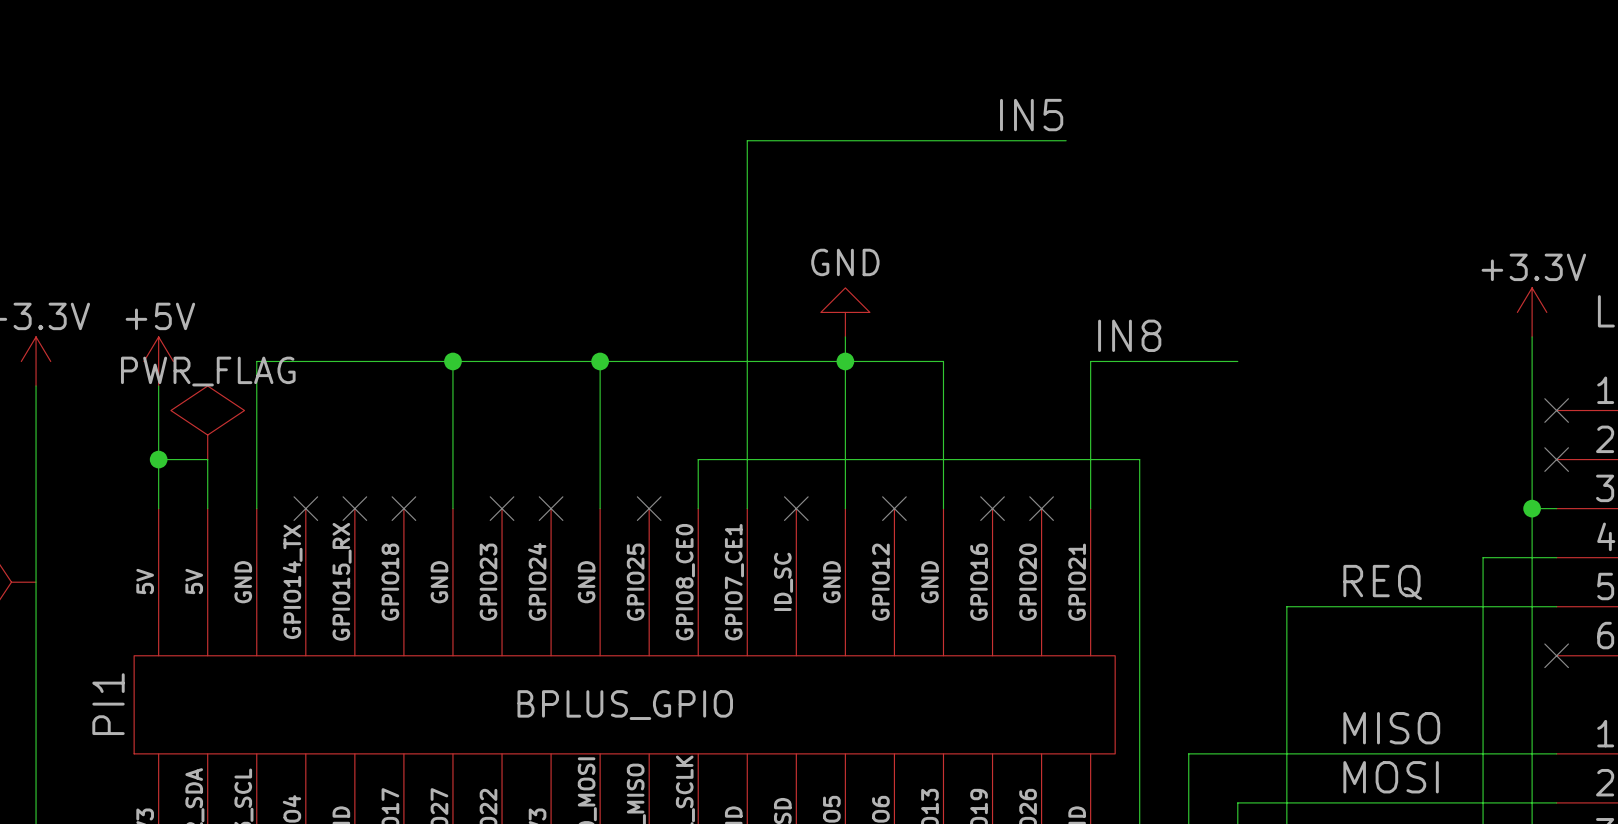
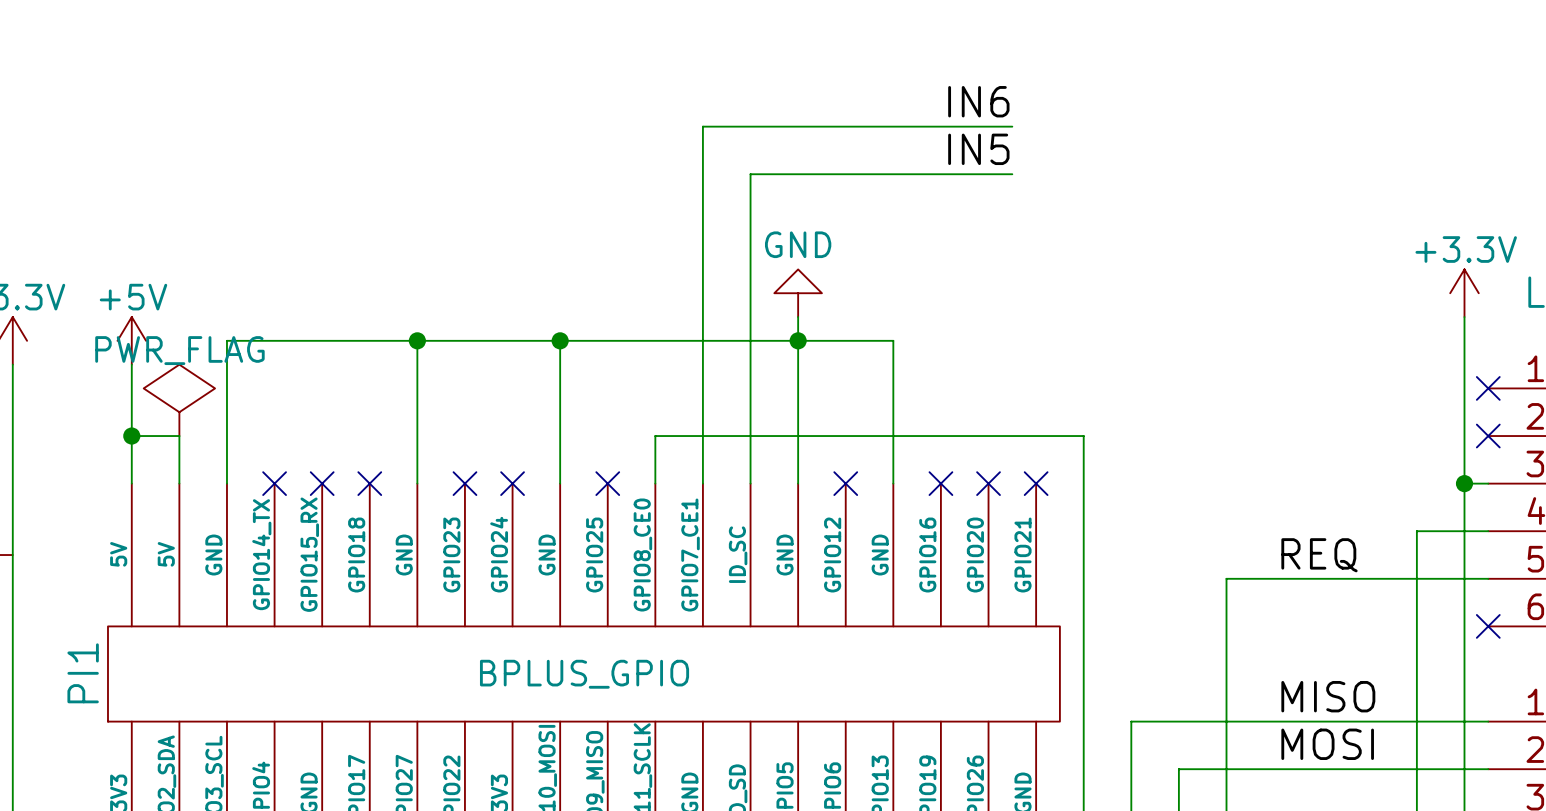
label: IN5 (1031, 115) -> IN6 (978, 101)
label: none -> IN5 (978, 149)
wire: none -> (1012, 174) (750, 174) (750, 483)
label: IN8 (1129, 335) -> none
wire: (1237, 361) (1090, 361) (1090, 508) -> none
no-connect mark: (796, 508) -> none
no-connect mark: none -> (1036, 483)

